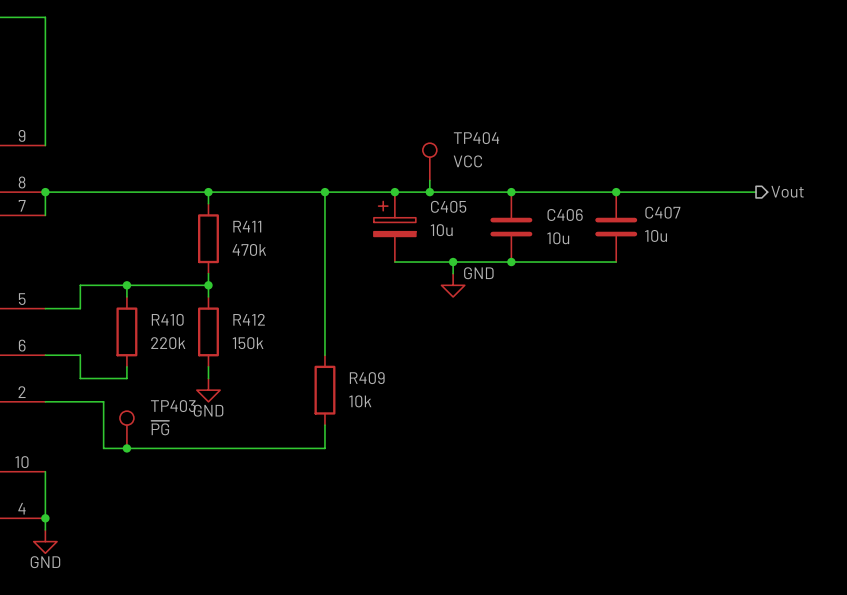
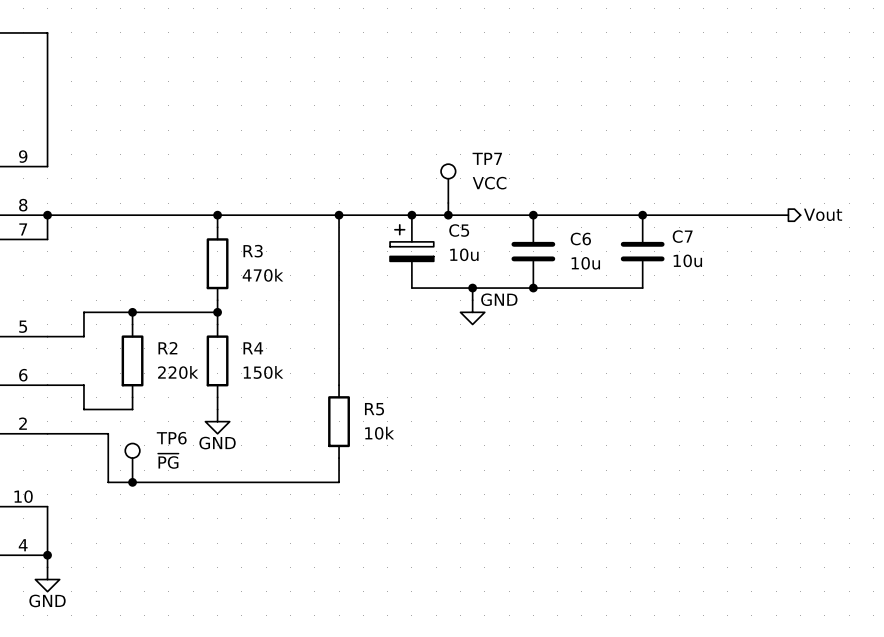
TP404 name: TP404 (476, 138) -> TP7 (487, 158)
C405 name: C405 (448, 206) -> C5 (459, 230)
C407 name: C407 (662, 212) -> C7 (682, 236)
C406 name: C406 (565, 214) -> C6 (580, 239)
R411 name: R411 (247, 226) -> R3 (253, 251)
R410 name: R410 (167, 319) -> R2 (167, 348)
R412 name: R412 (249, 319) -> R4 (253, 348)
R409 name: R409 (367, 378) -> R5 (374, 409)
TP403 name: TP403 (173, 406) -> TP6 (171, 438)

